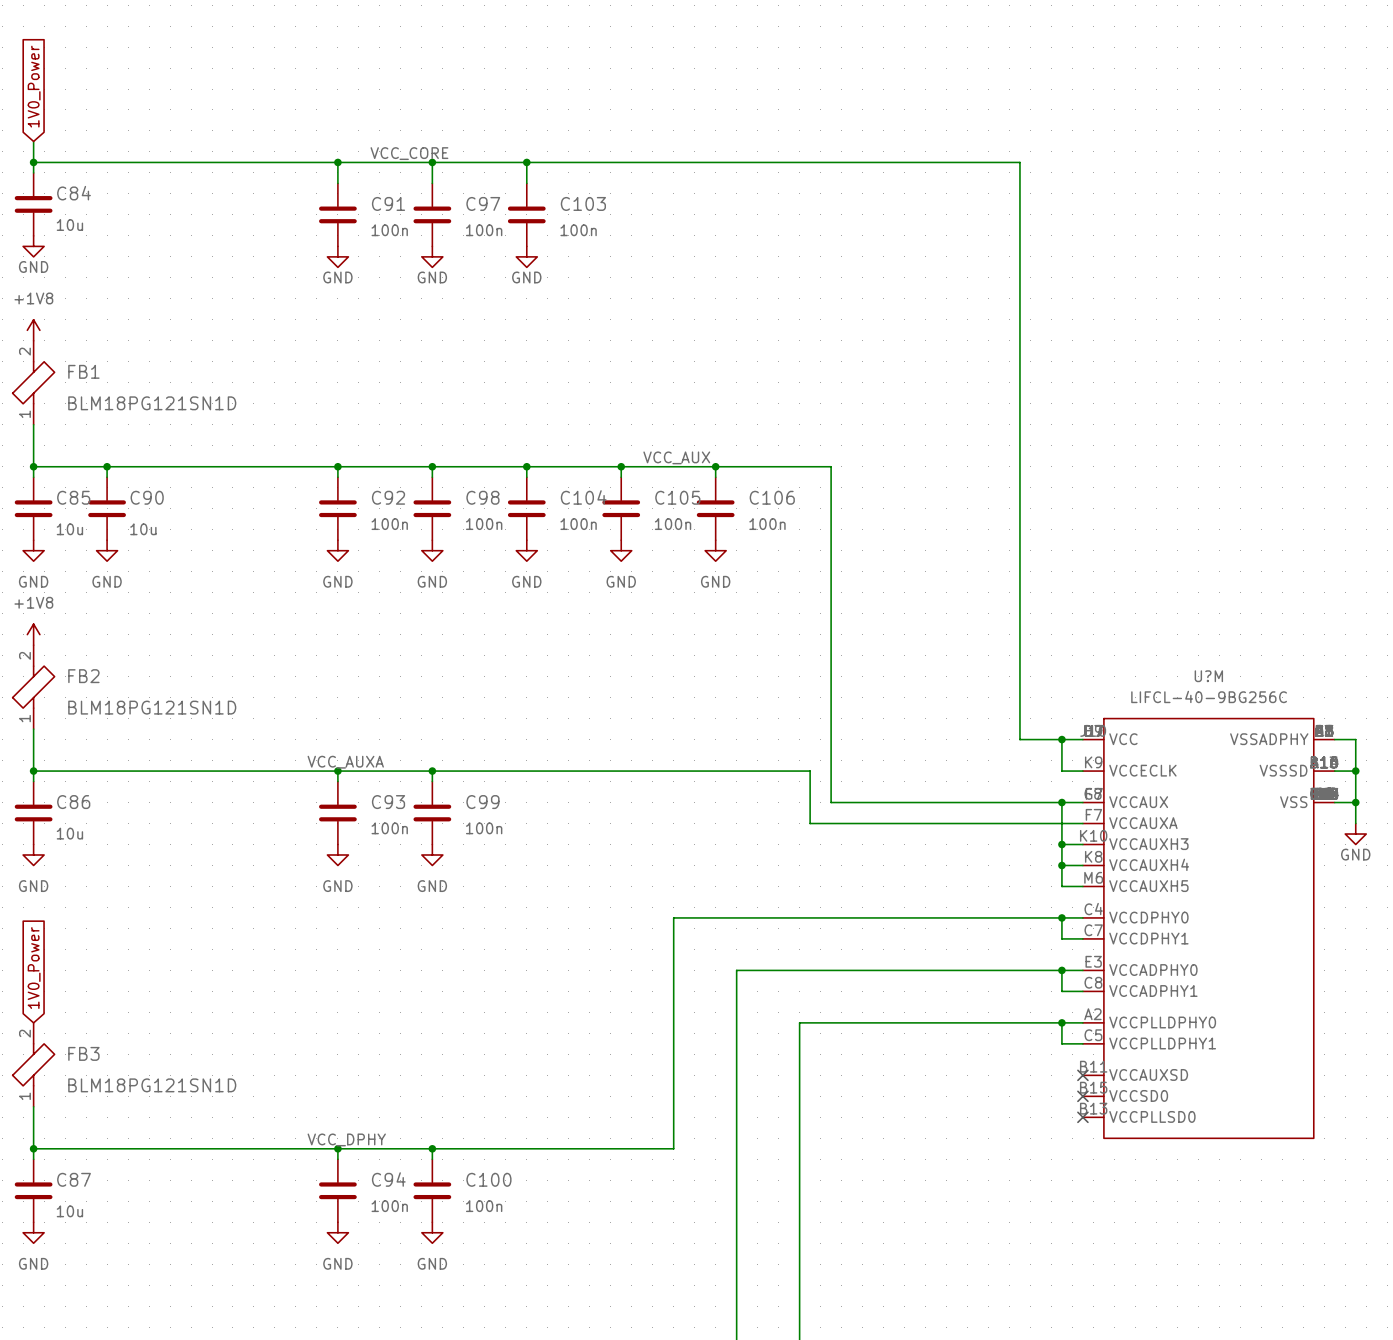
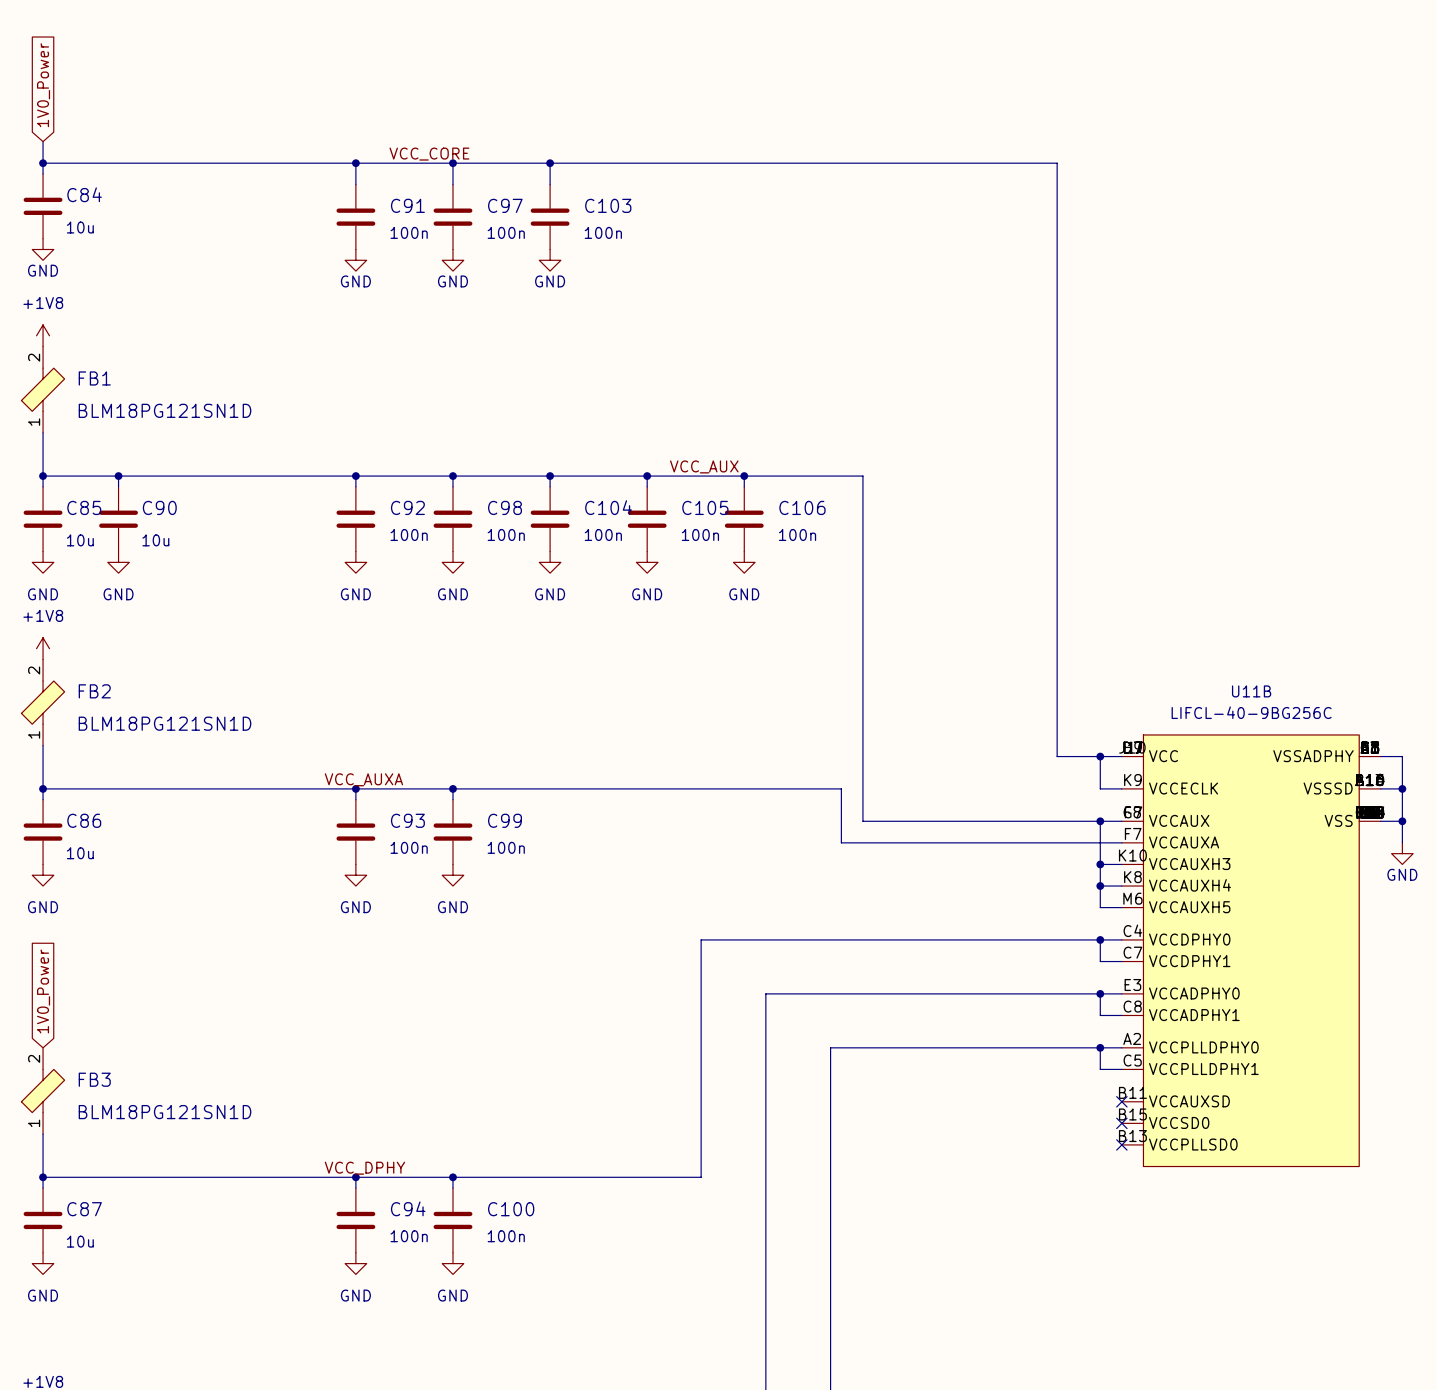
U?M name: U?M (1208, 676) -> U11B (1251, 691)

